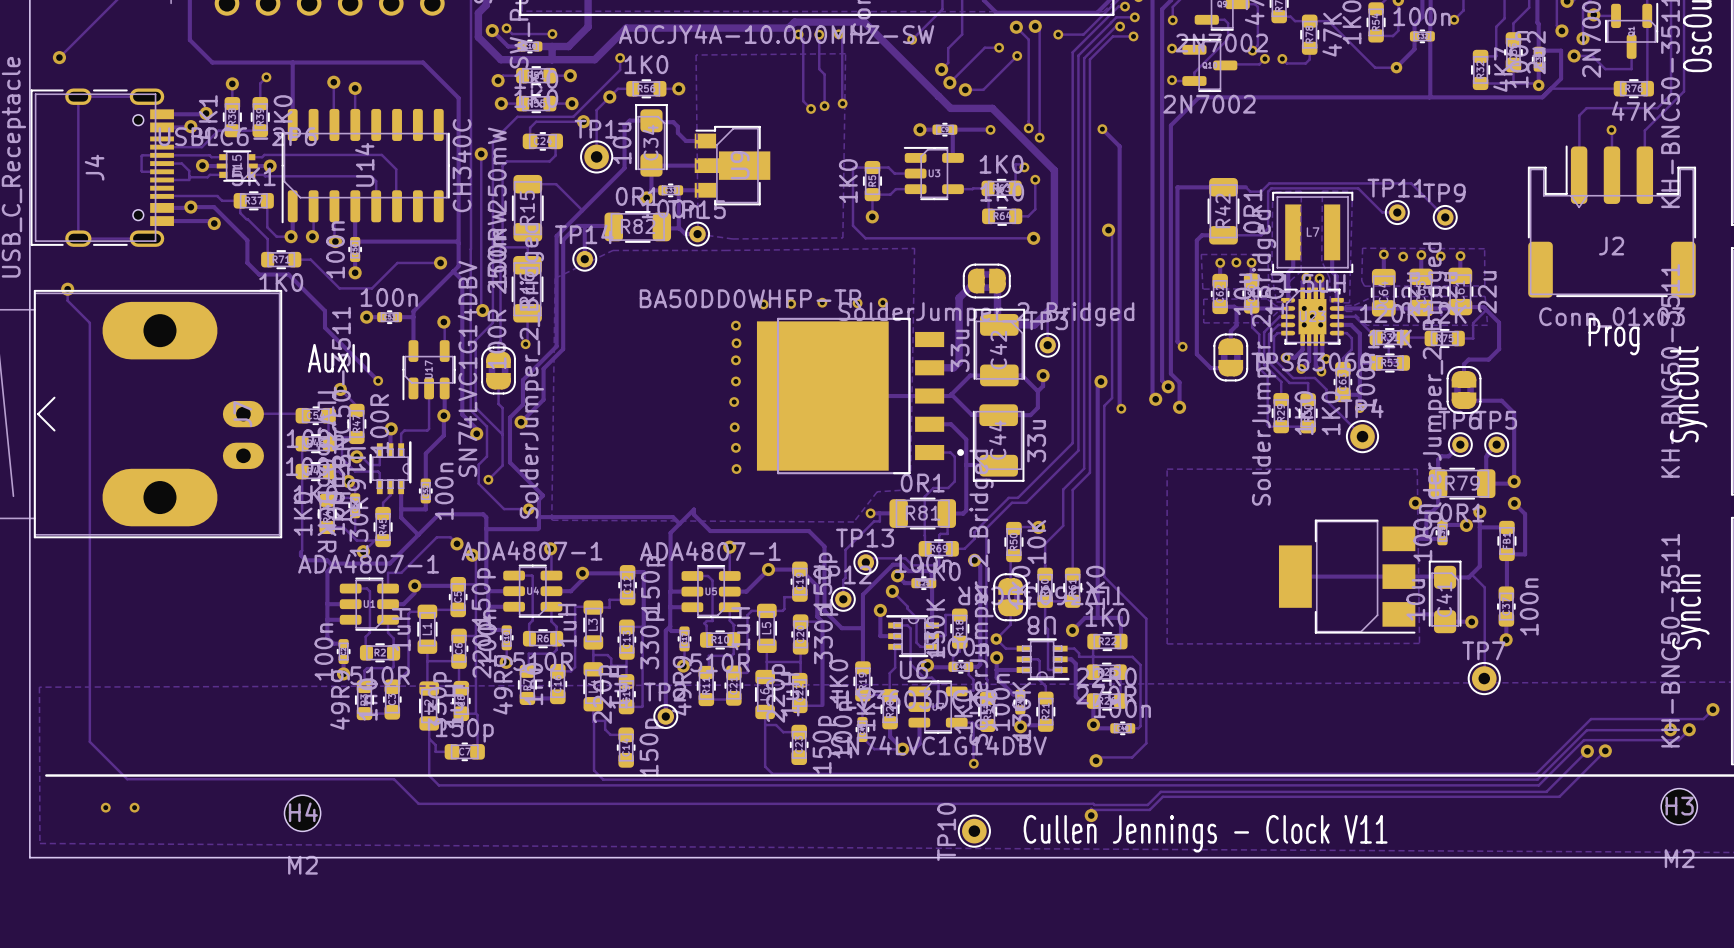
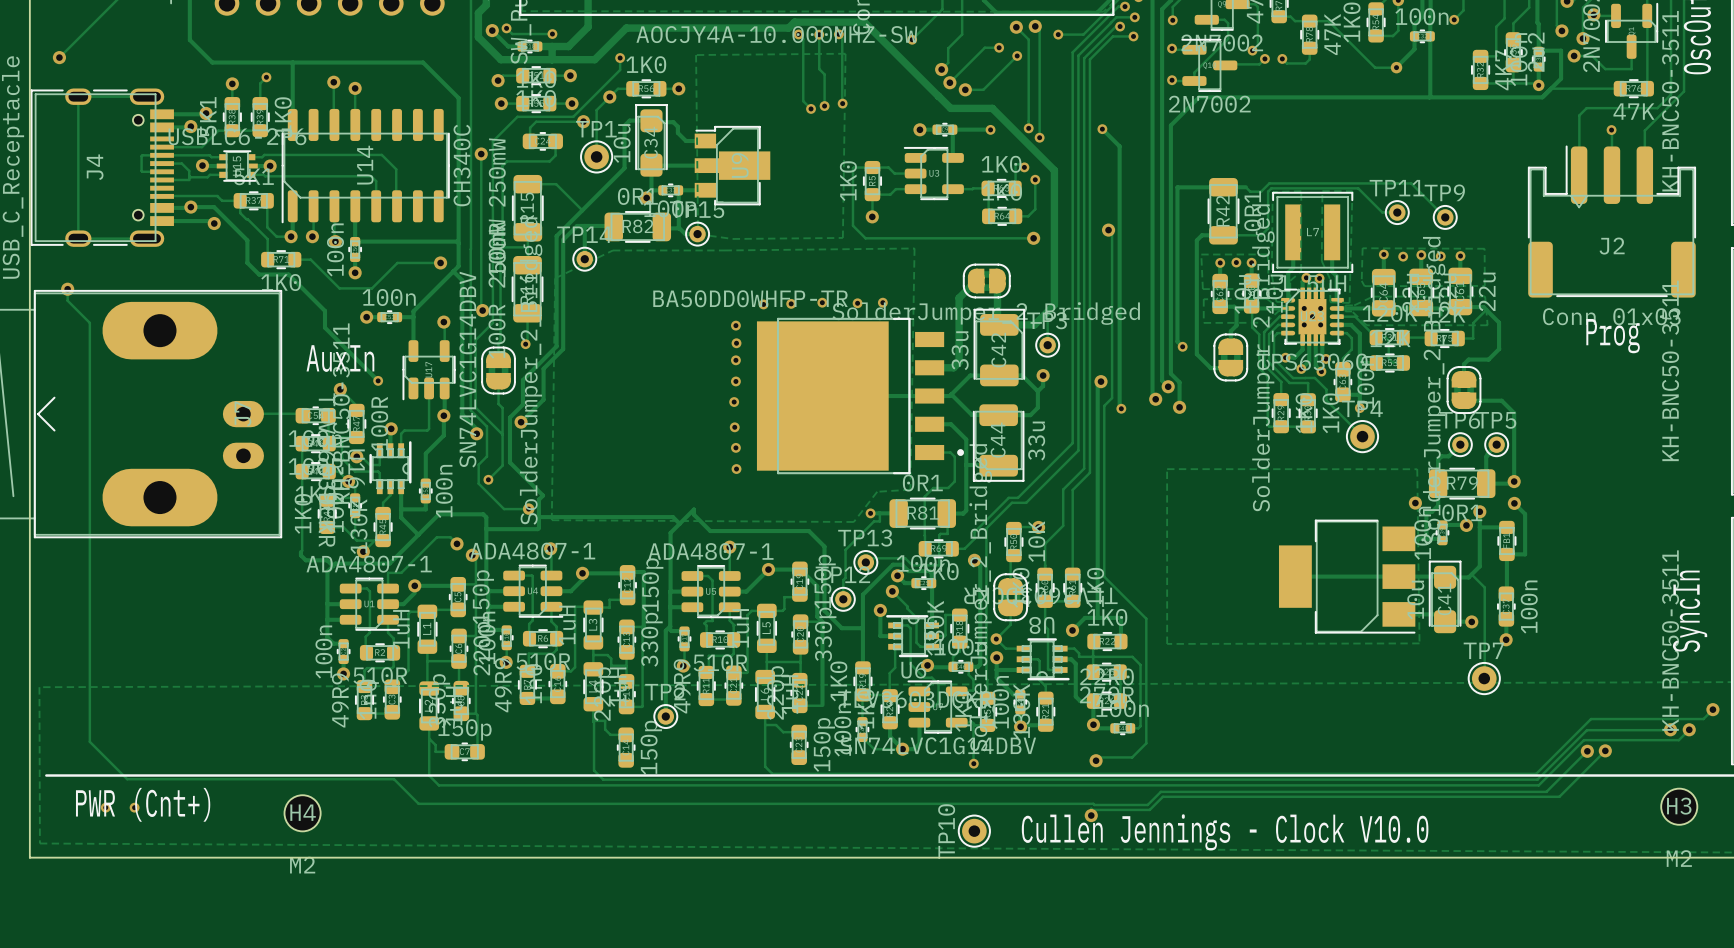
text: SyncOut (1688, 394) -> none
text: none -> PWR (Cnt+) (143, 804)
text: Cullen Jennings - Clock V11 (1205, 833) -> Cullen Jennings - Clock V10.0 (1225, 832)

